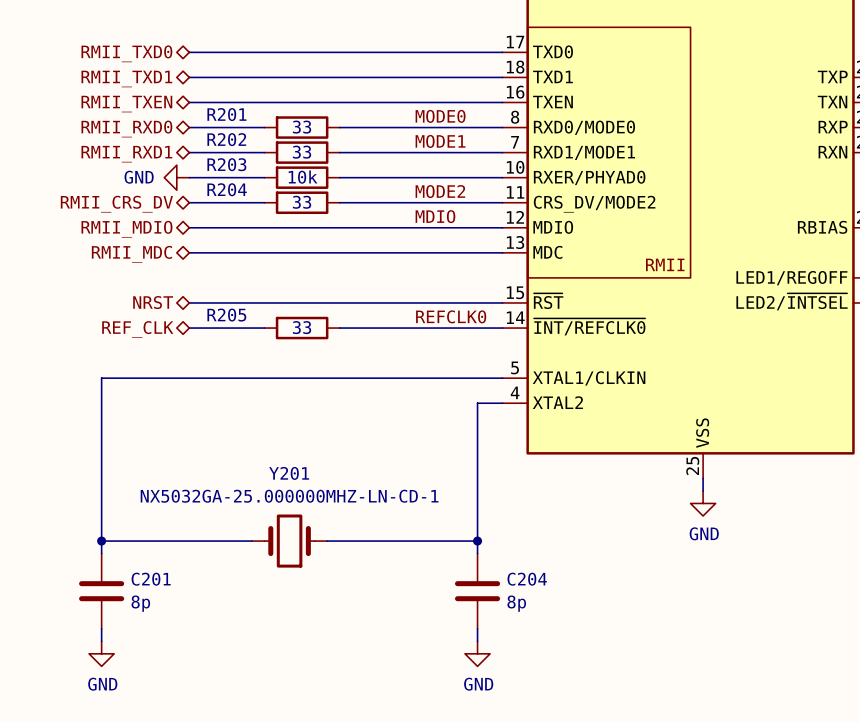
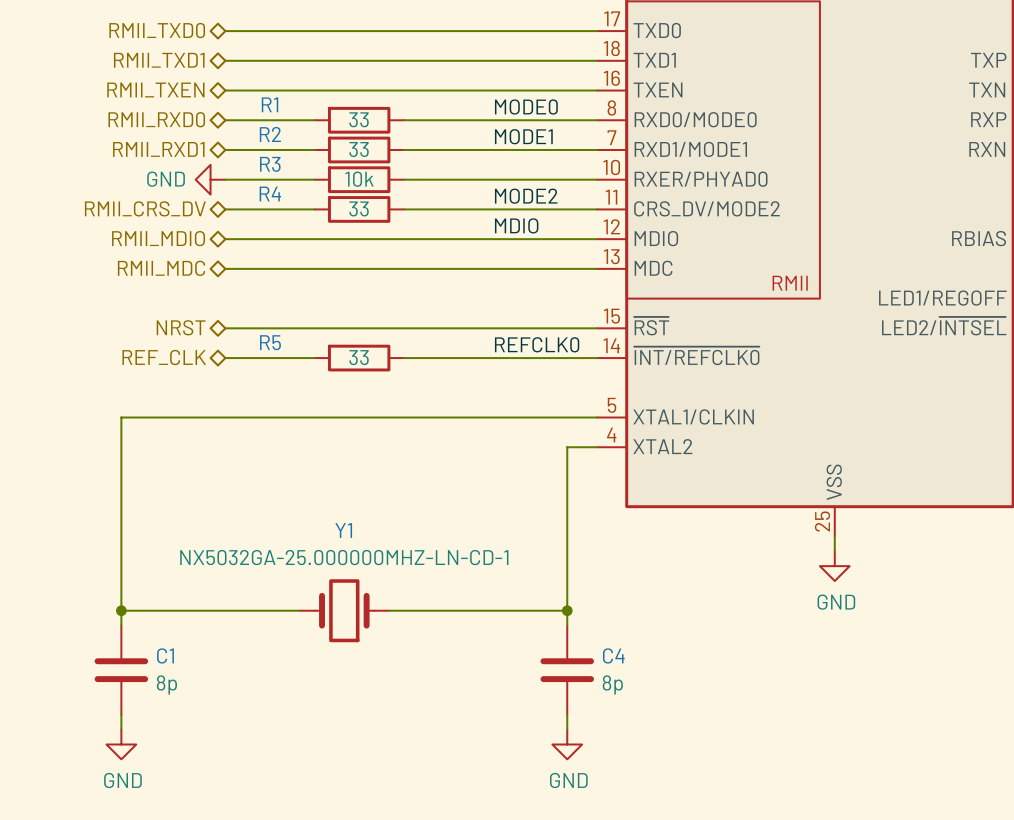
R201 name: R201 (226, 114) -> R1 (270, 104)
R202 name: R202 (226, 139) -> R2 (270, 134)
R203 name: R203 (226, 164) -> R3 (270, 164)
R204 name: R204 (227, 189) -> R4 (270, 194)
R205 name: R205 (226, 315) -> R5 (270, 342)
Y201 name: Y201 (289, 473) -> Y1 (343, 530)
C201 name: C201 (151, 579) -> C1 (165, 655)
C204 name: C204 (527, 579) -> C4 (613, 655)

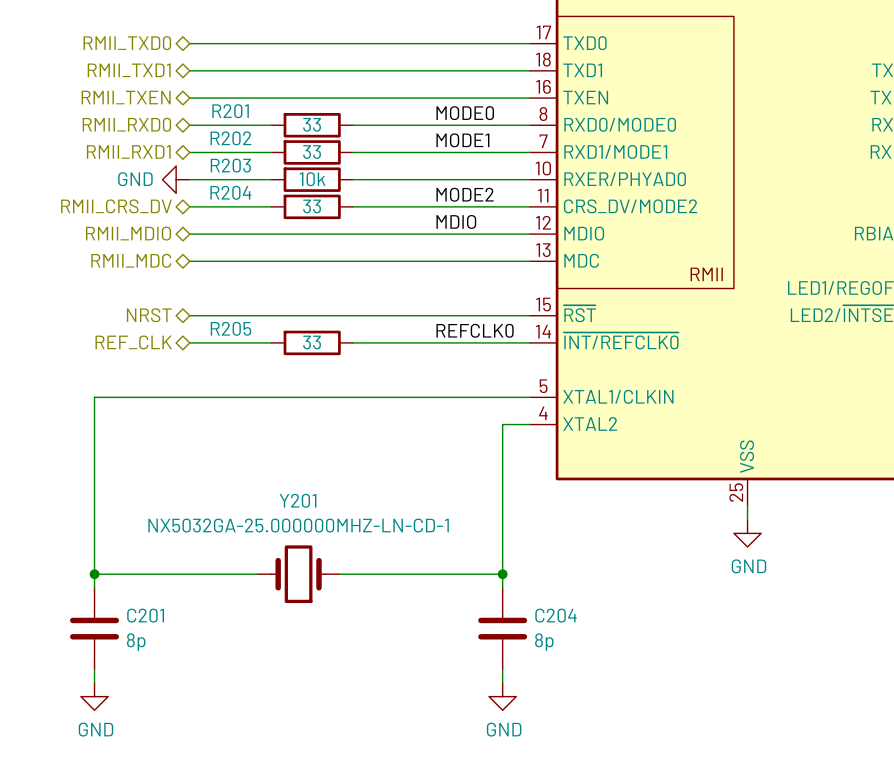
R1 name: R1 (270, 104) -> R201 (230, 111)
R2 name: R2 (270, 134) -> R202 (230, 138)
R3 name: R3 (270, 164) -> R203 (230, 165)
R4 name: R4 (270, 194) -> R204 (230, 192)
R5 name: R5 (270, 342) -> R205 (230, 328)
Y1 name: Y1 (343, 530) -> Y201 (298, 500)
C1 name: C1 (165, 655) -> C201 (145, 615)
C4 name: C4 (613, 655) -> C204 (556, 615)

